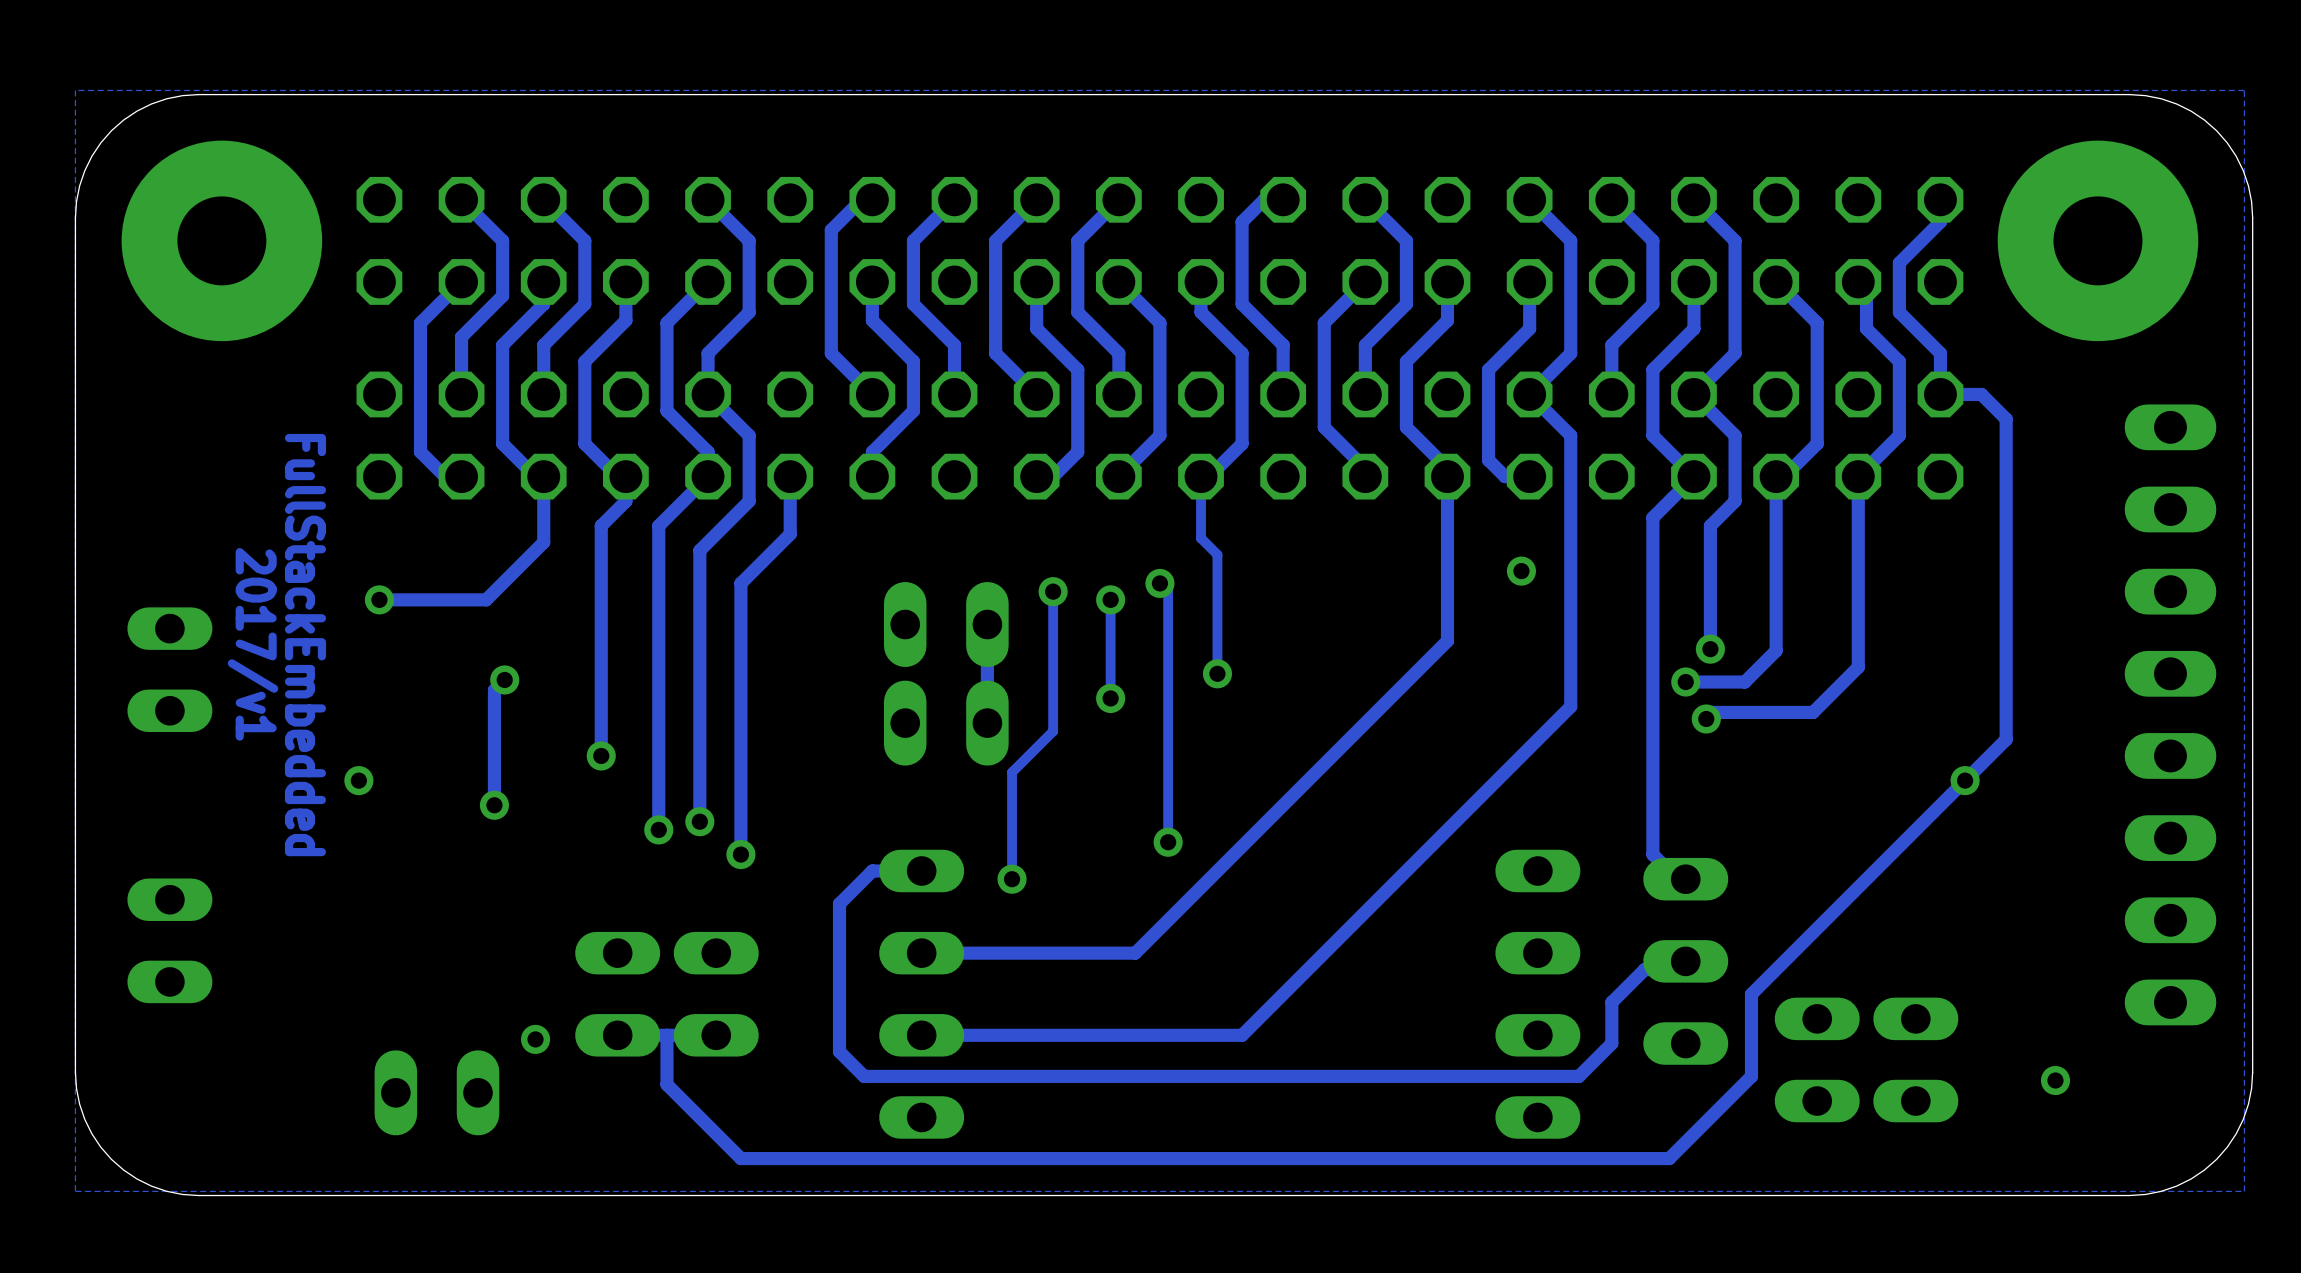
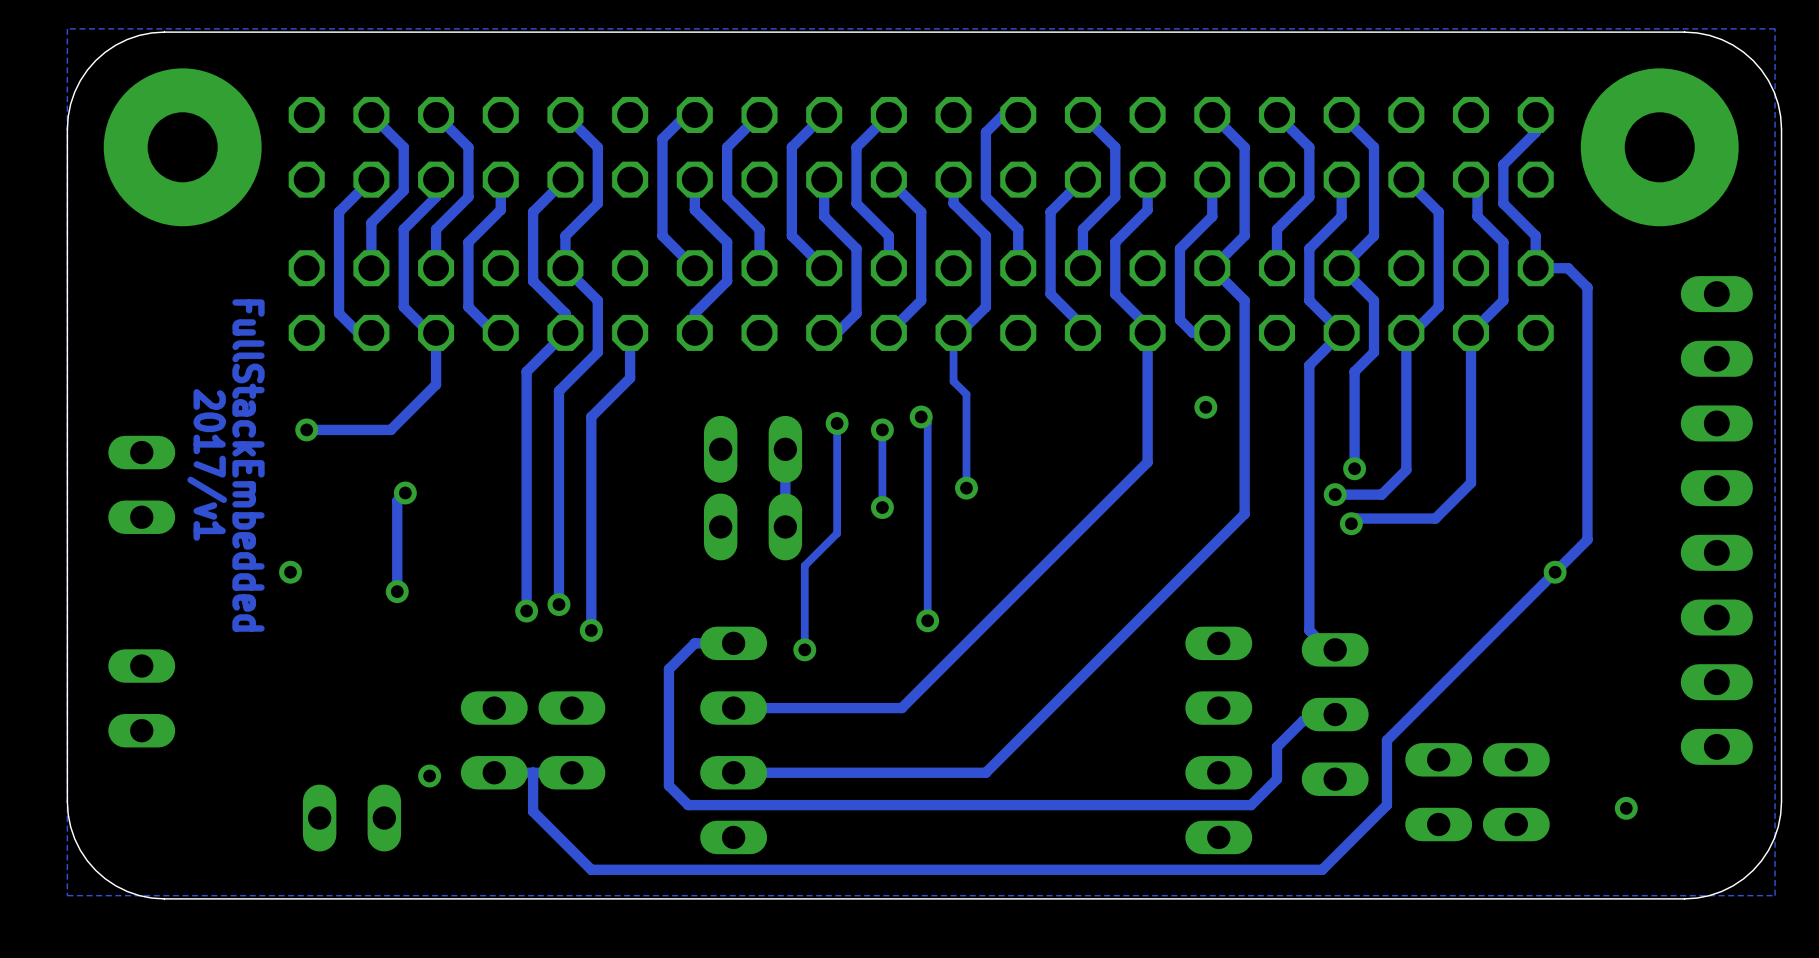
track: (625, 476) (625, 501) (601, 525) (601, 755) -> none
via: (601, 755) -> none

